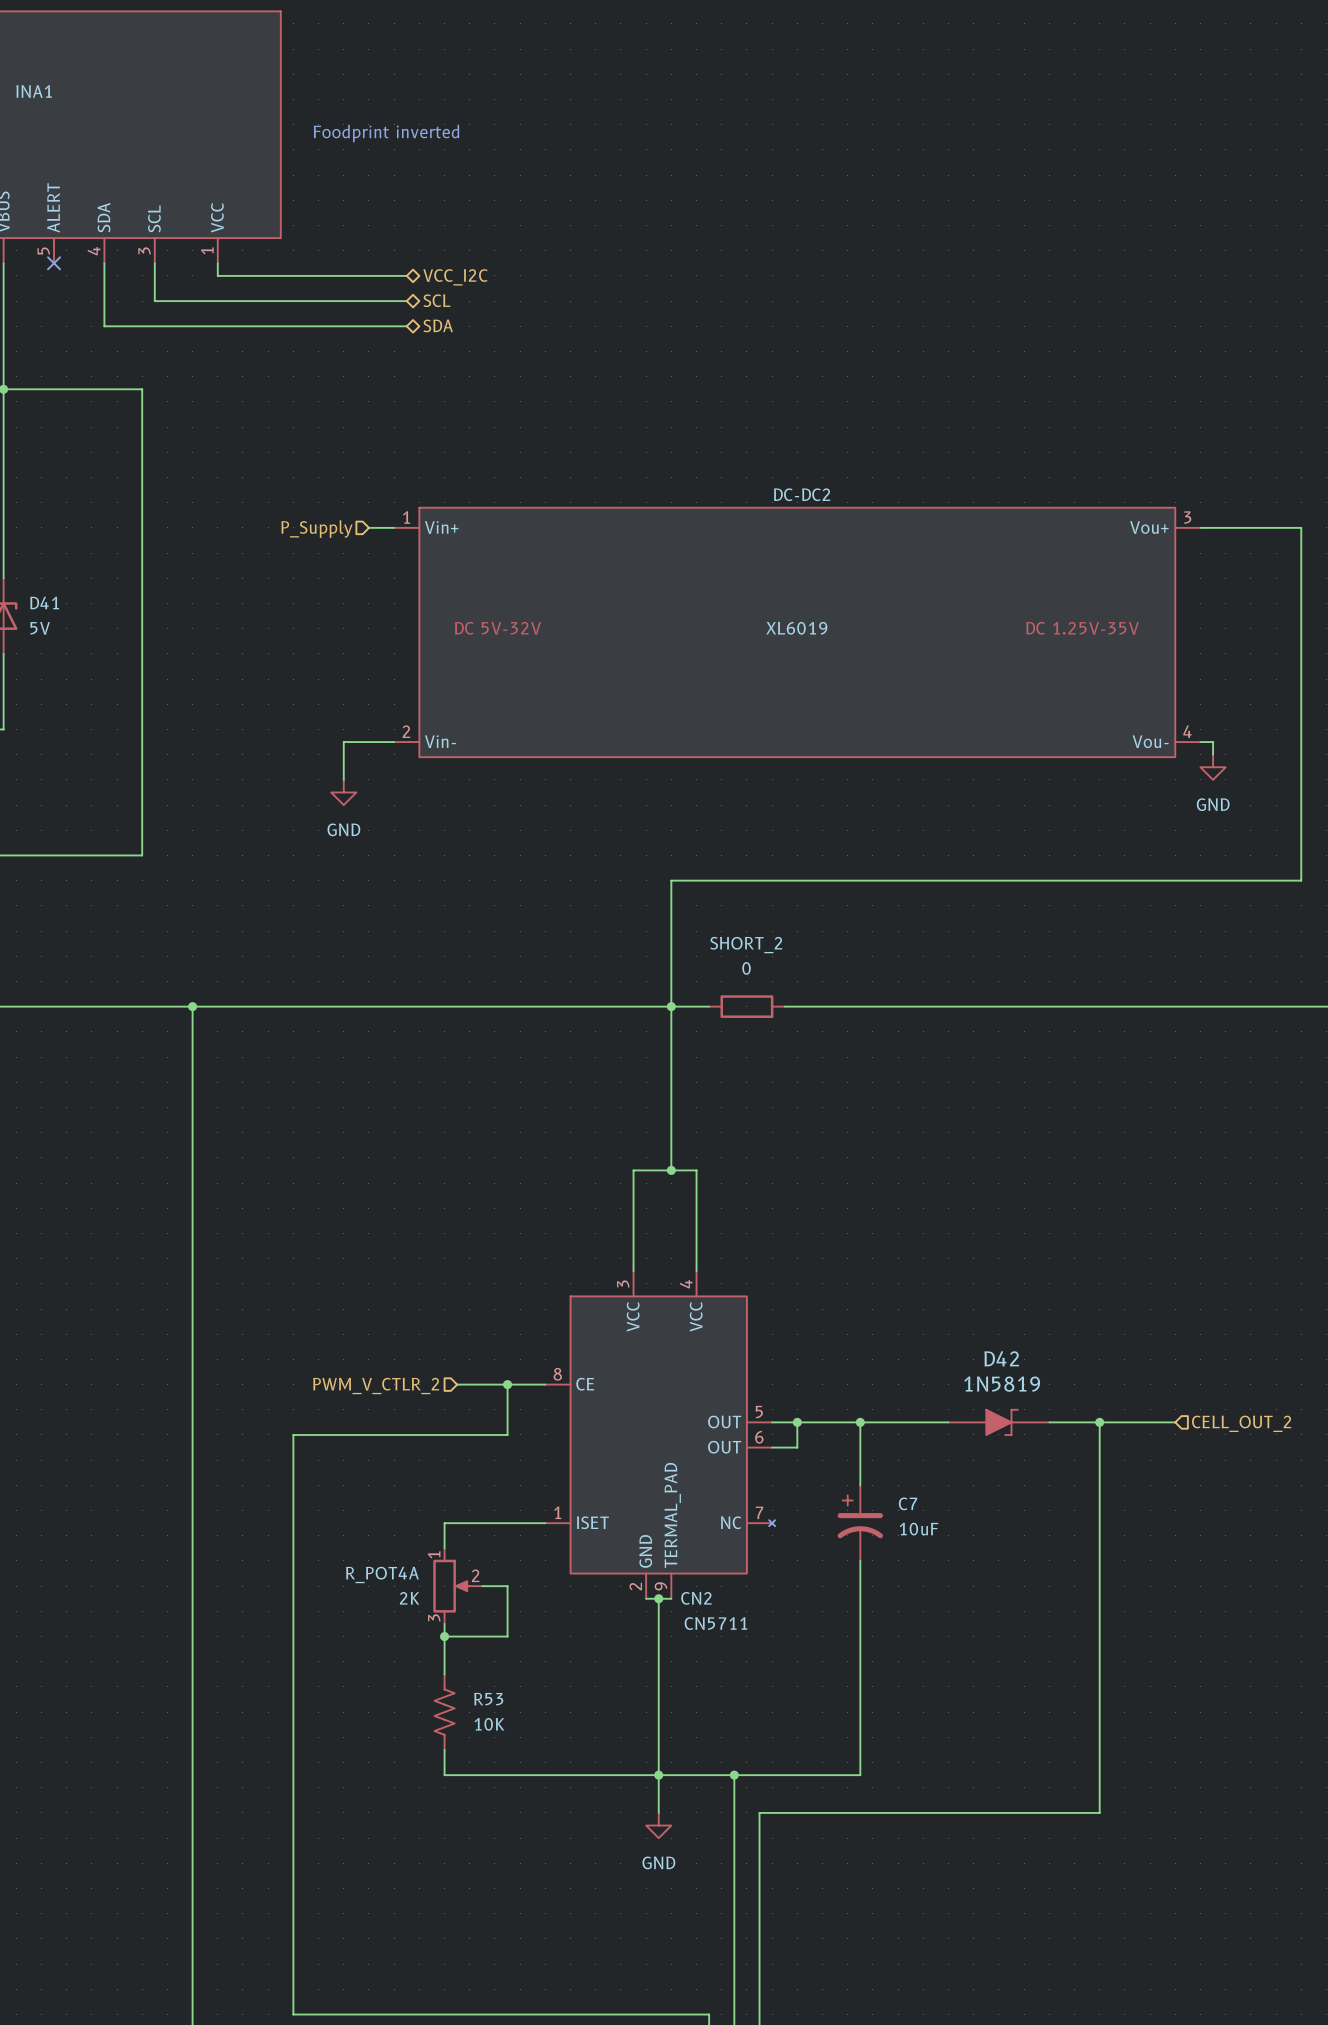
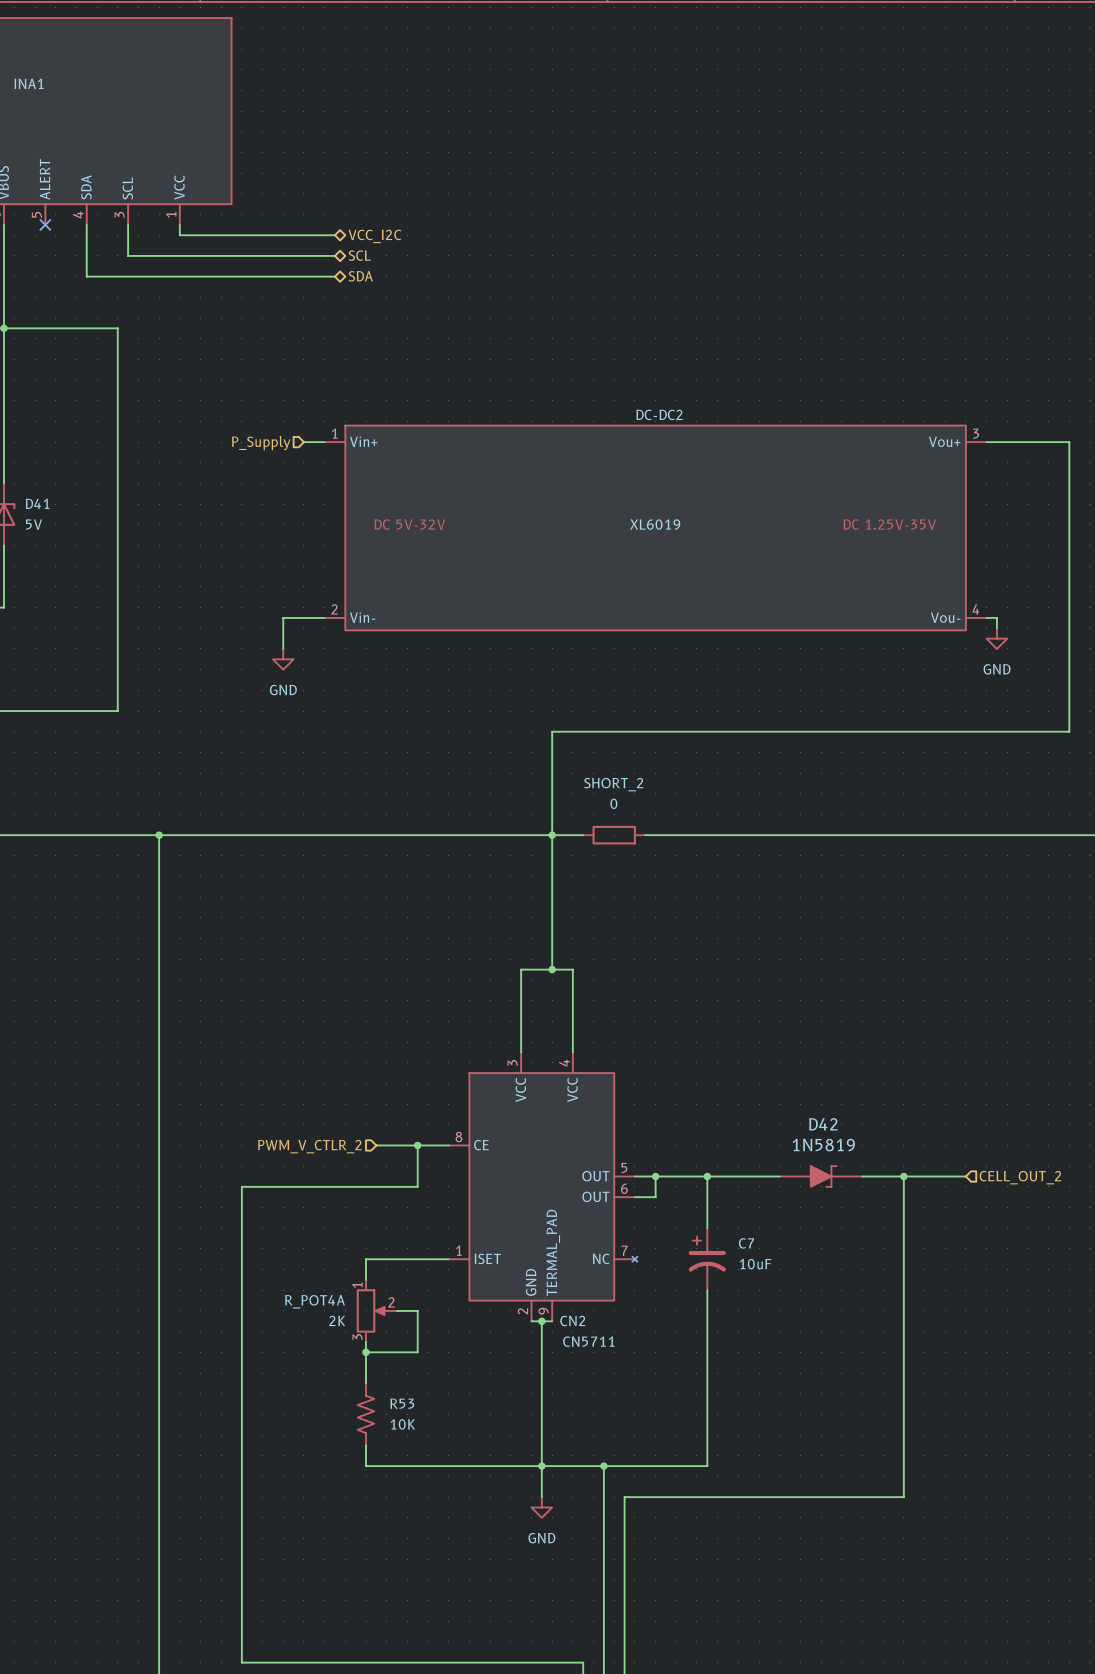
text: Foodprint inverted (386, 133) -> none

